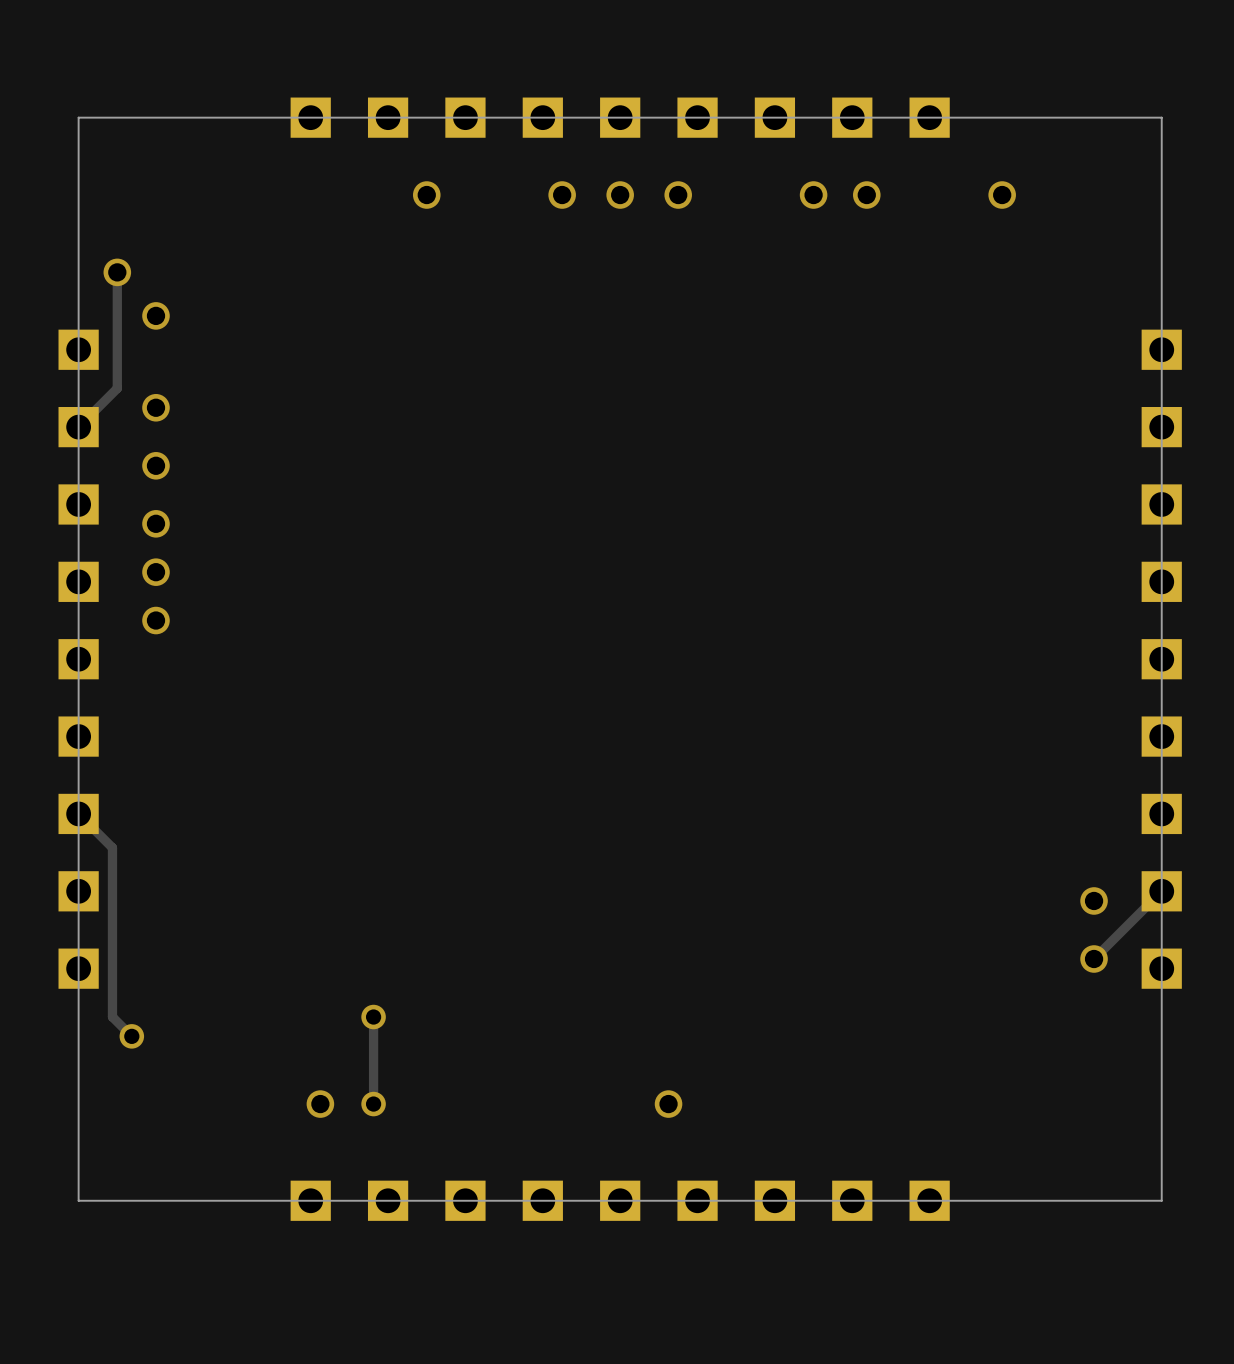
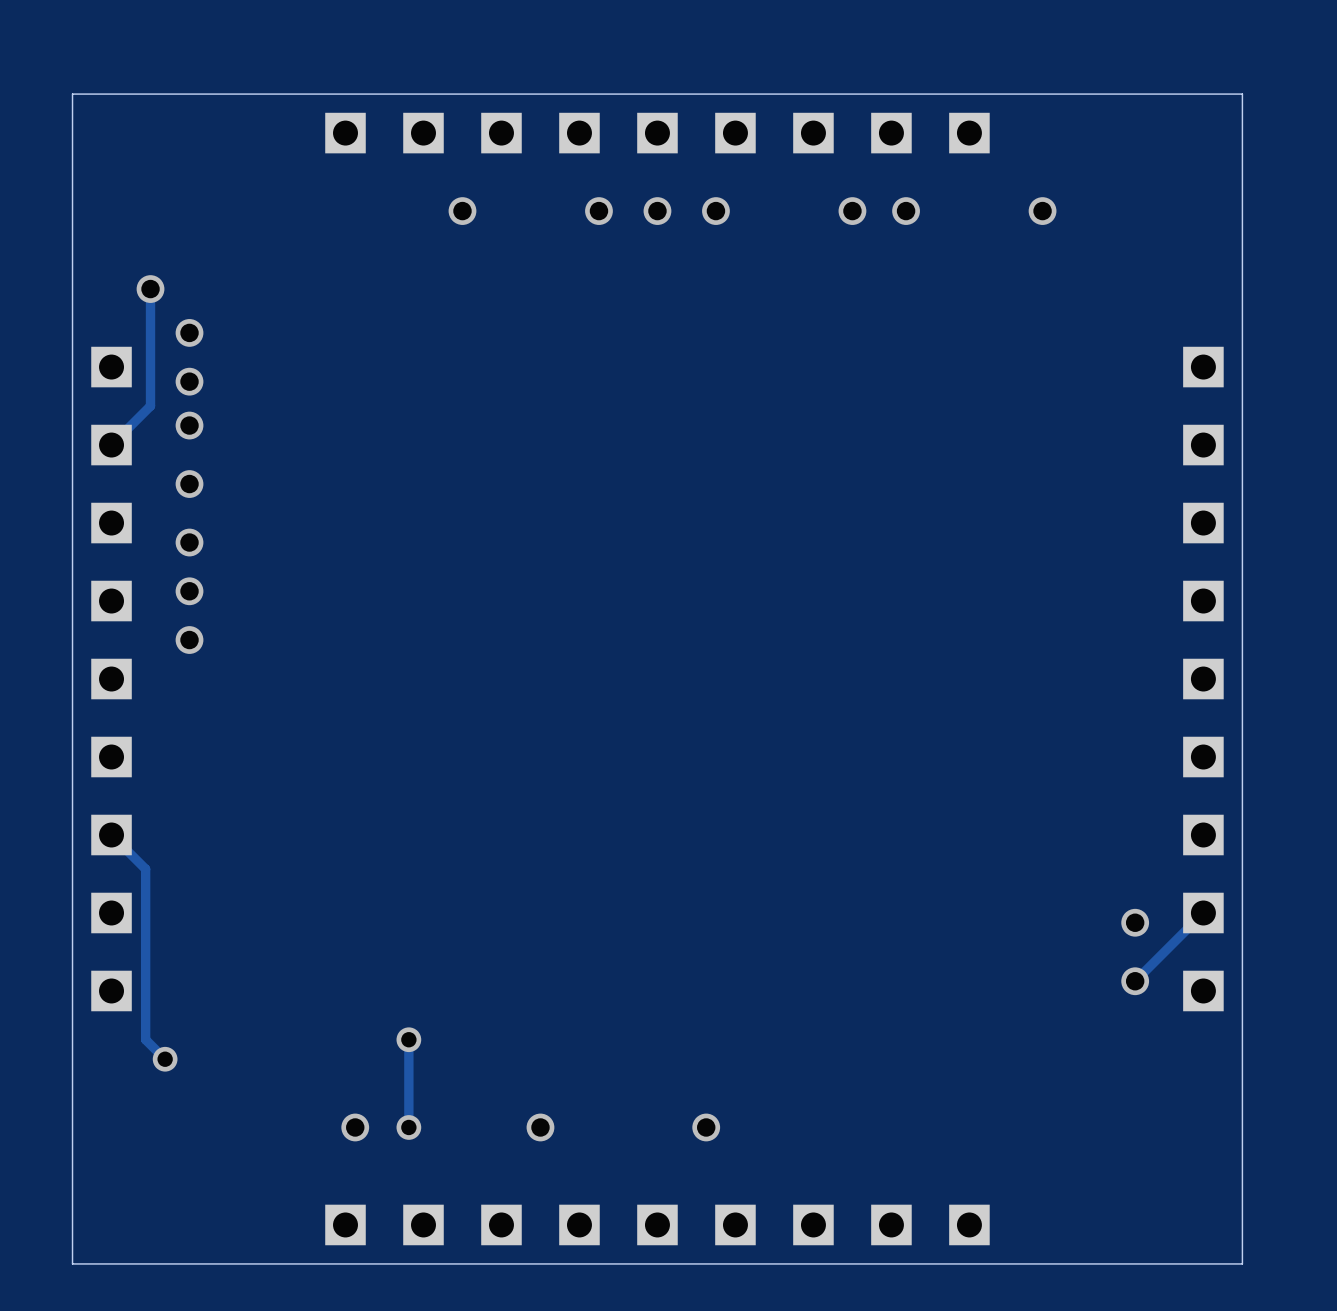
board edge: (1161, 117) (1161, 1200) (78, 1200) (78, 117) (1161, 117) -> (1242, 94) (1242, 1263) (72, 1263) (72, 94) (1242, 94)
via: none -> (189, 381)
via: none -> (540, 1127)

